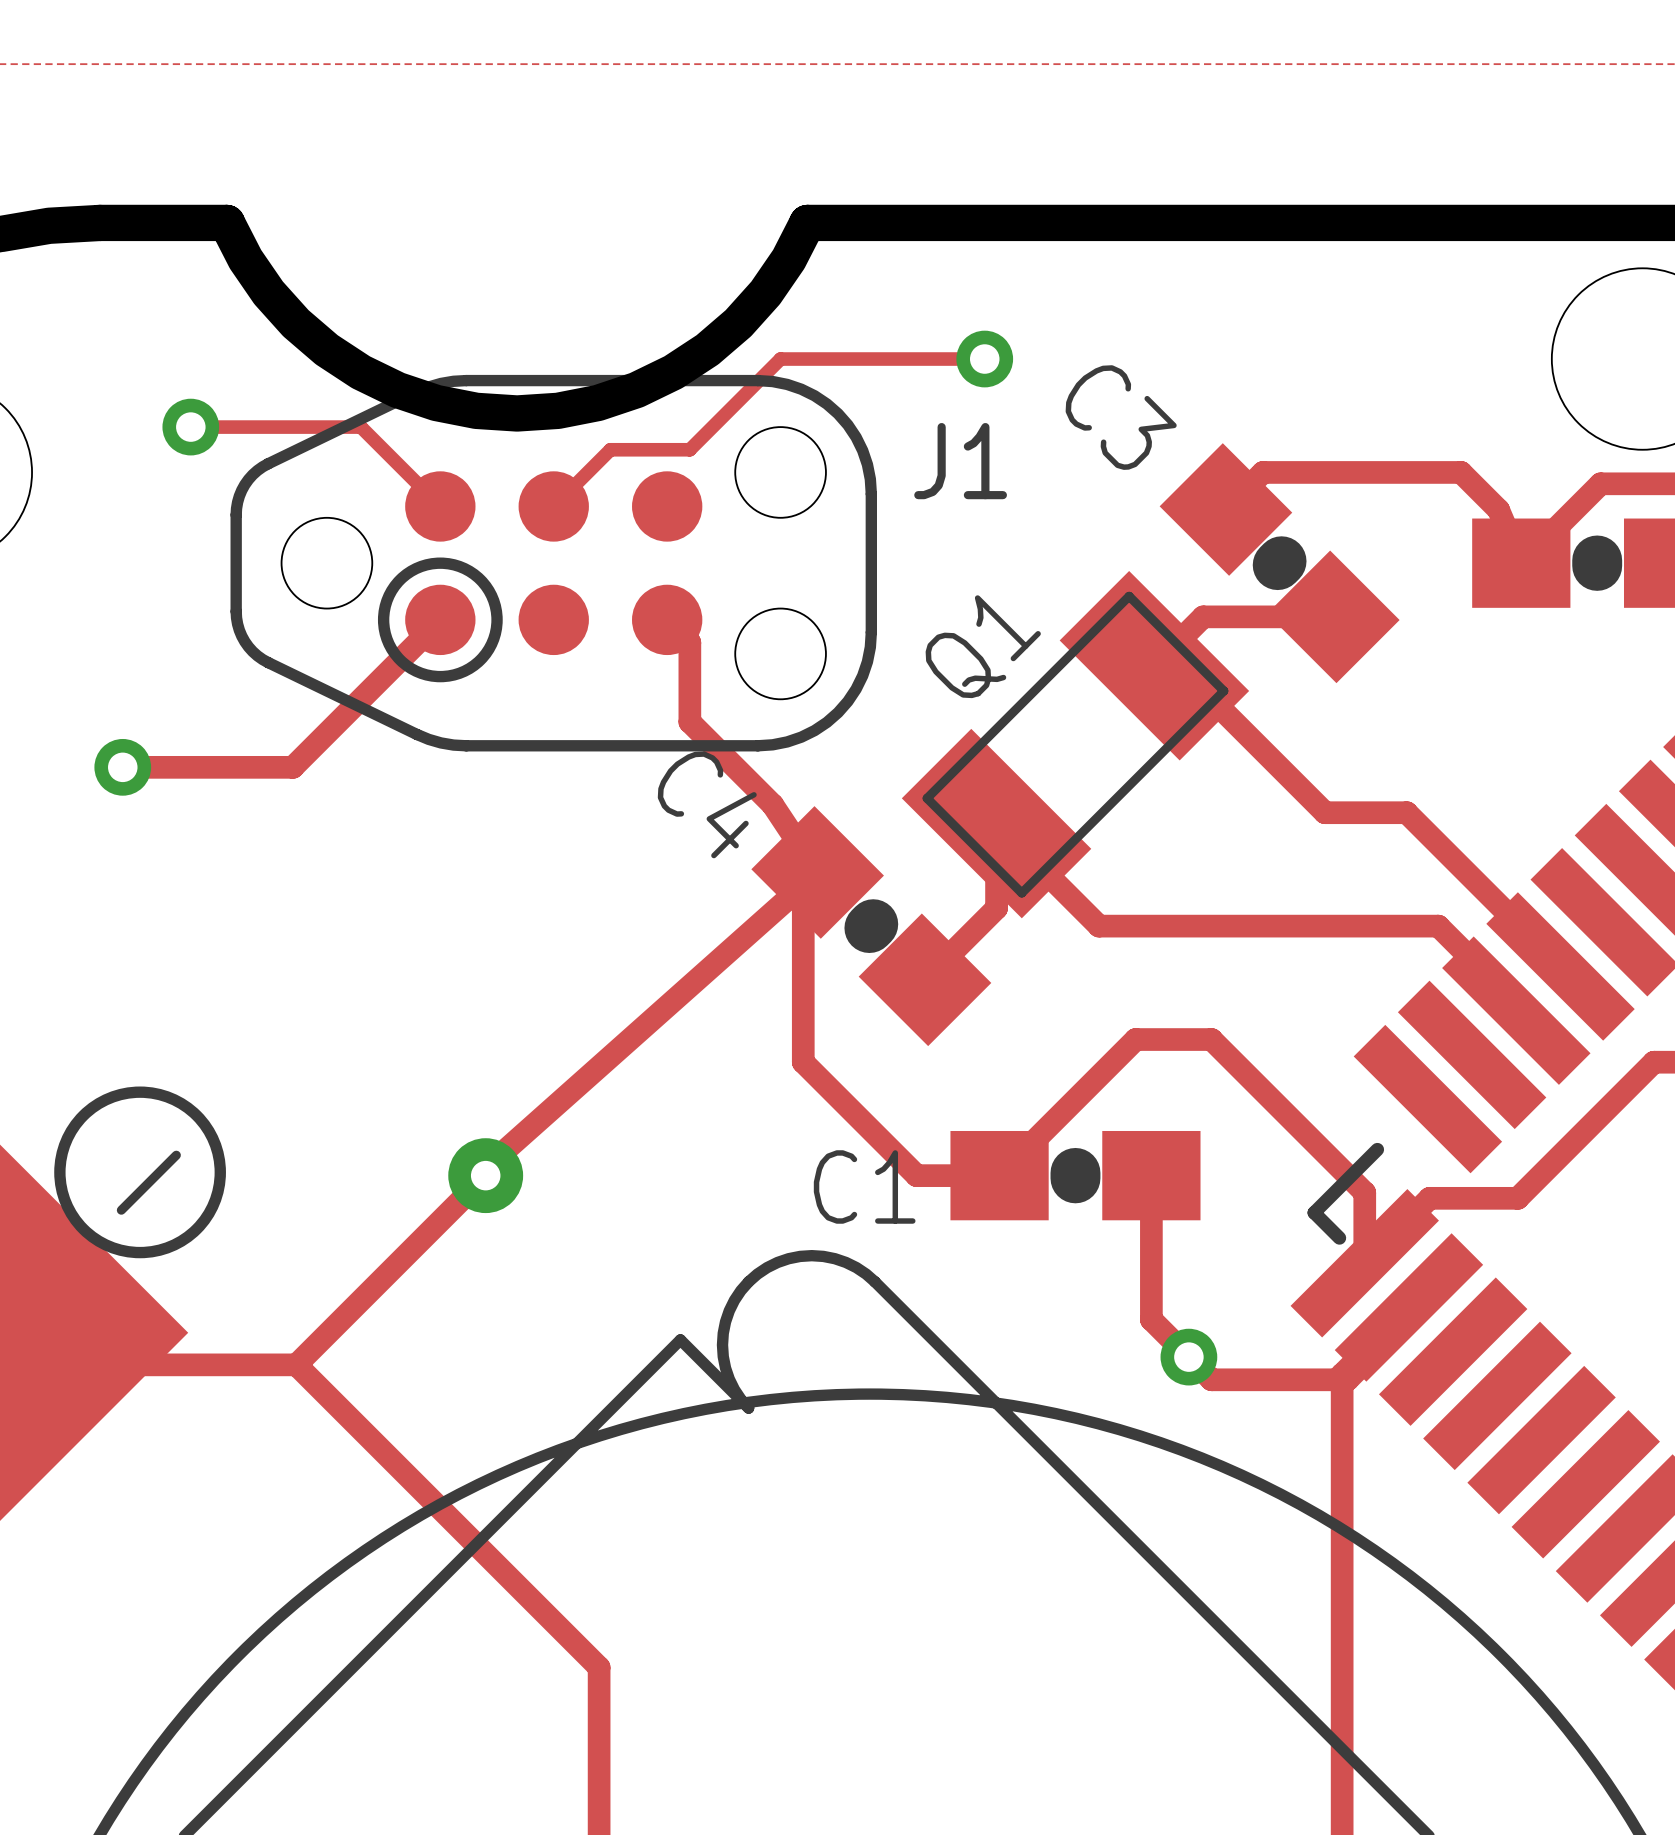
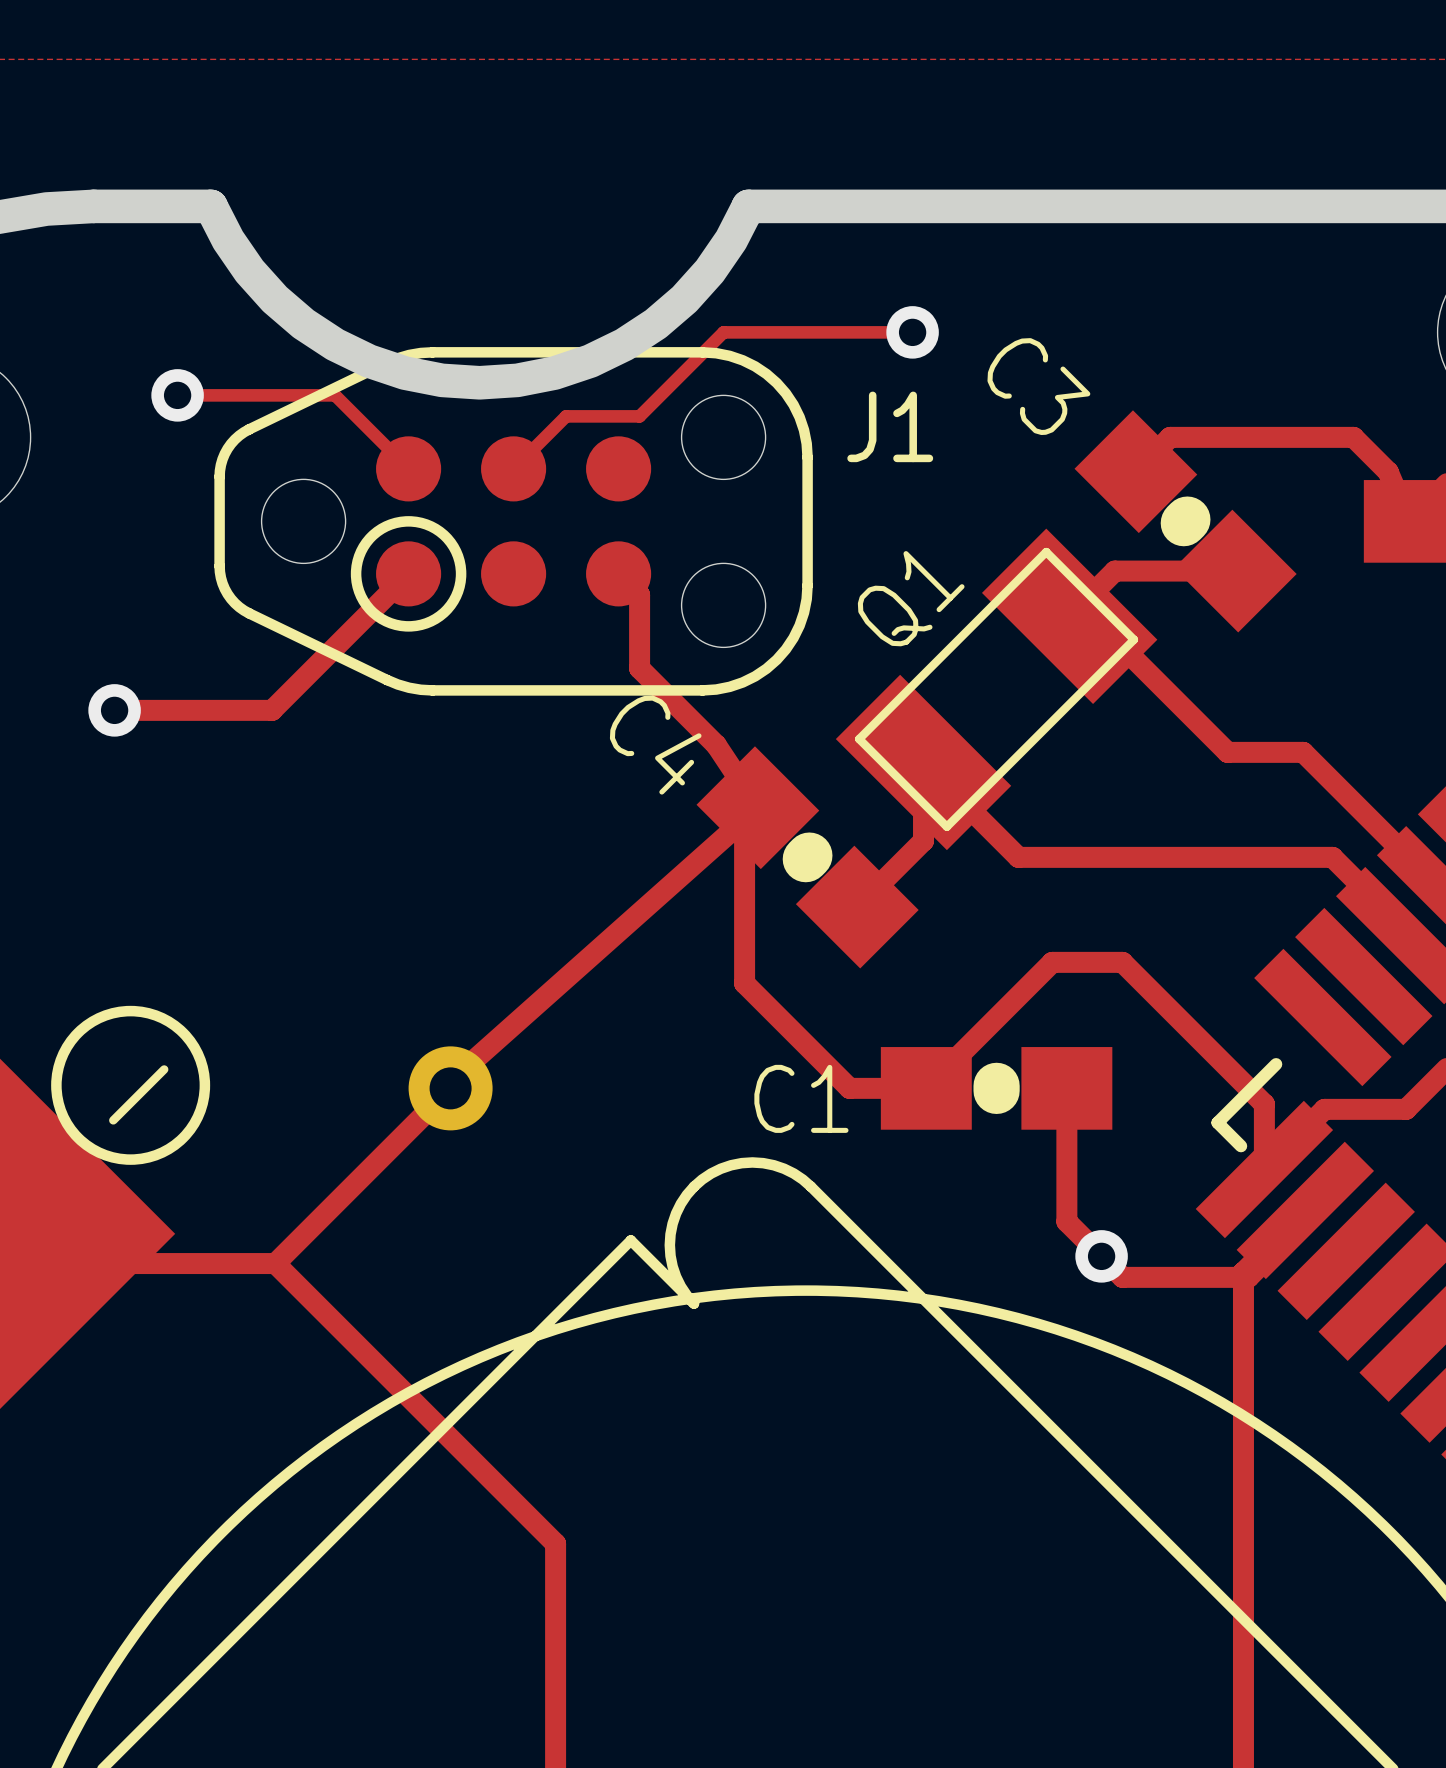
part footprint: [448, 1138, 524, 1214] -> [408, 1046, 493, 1131]

